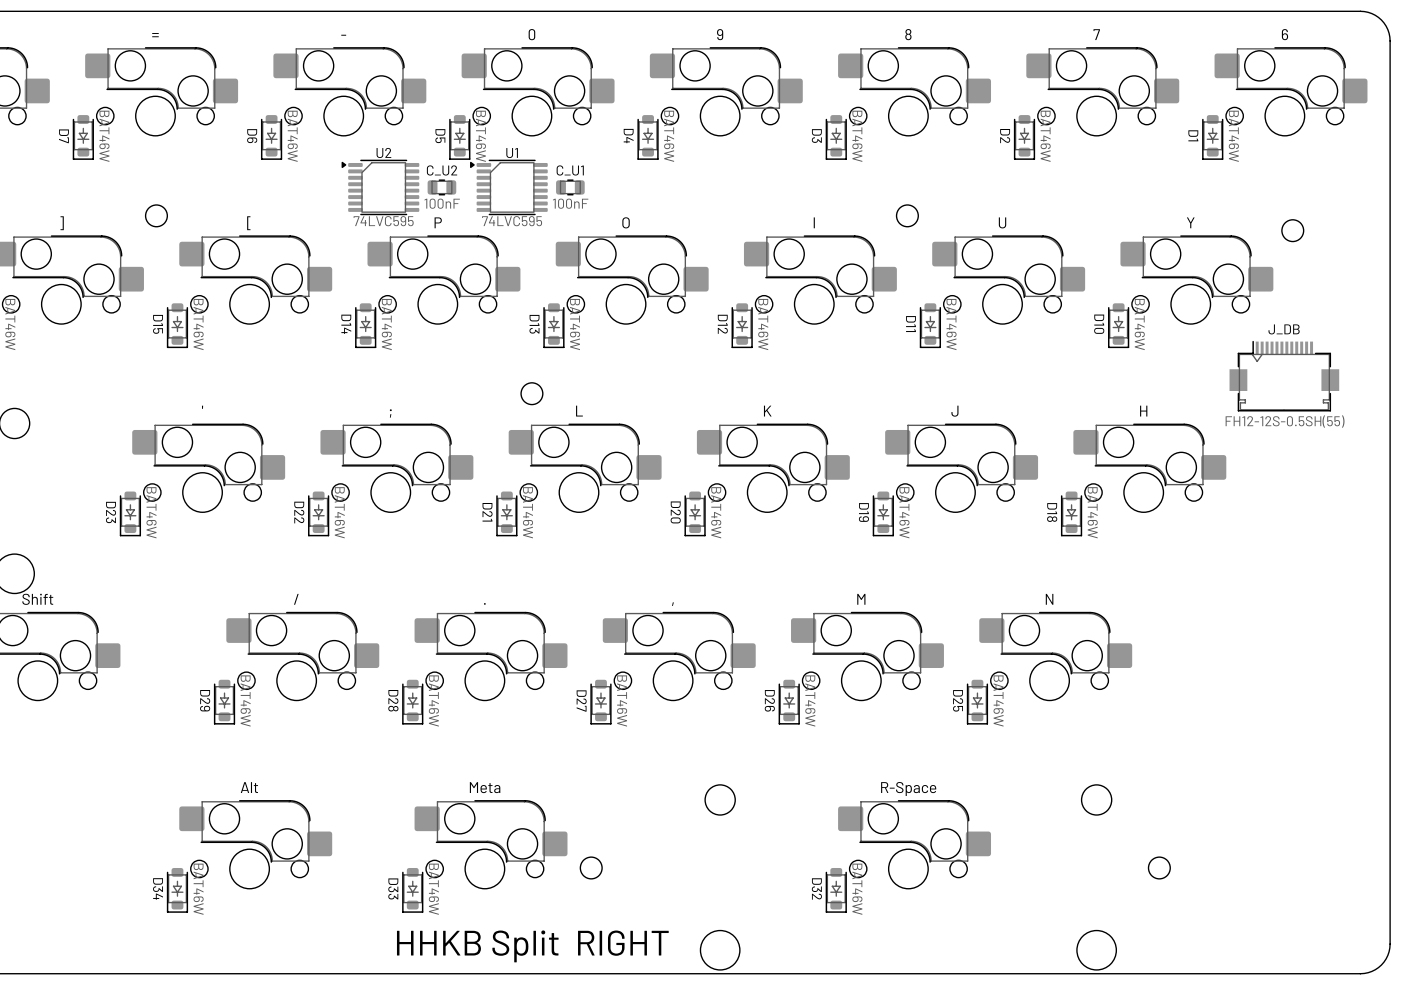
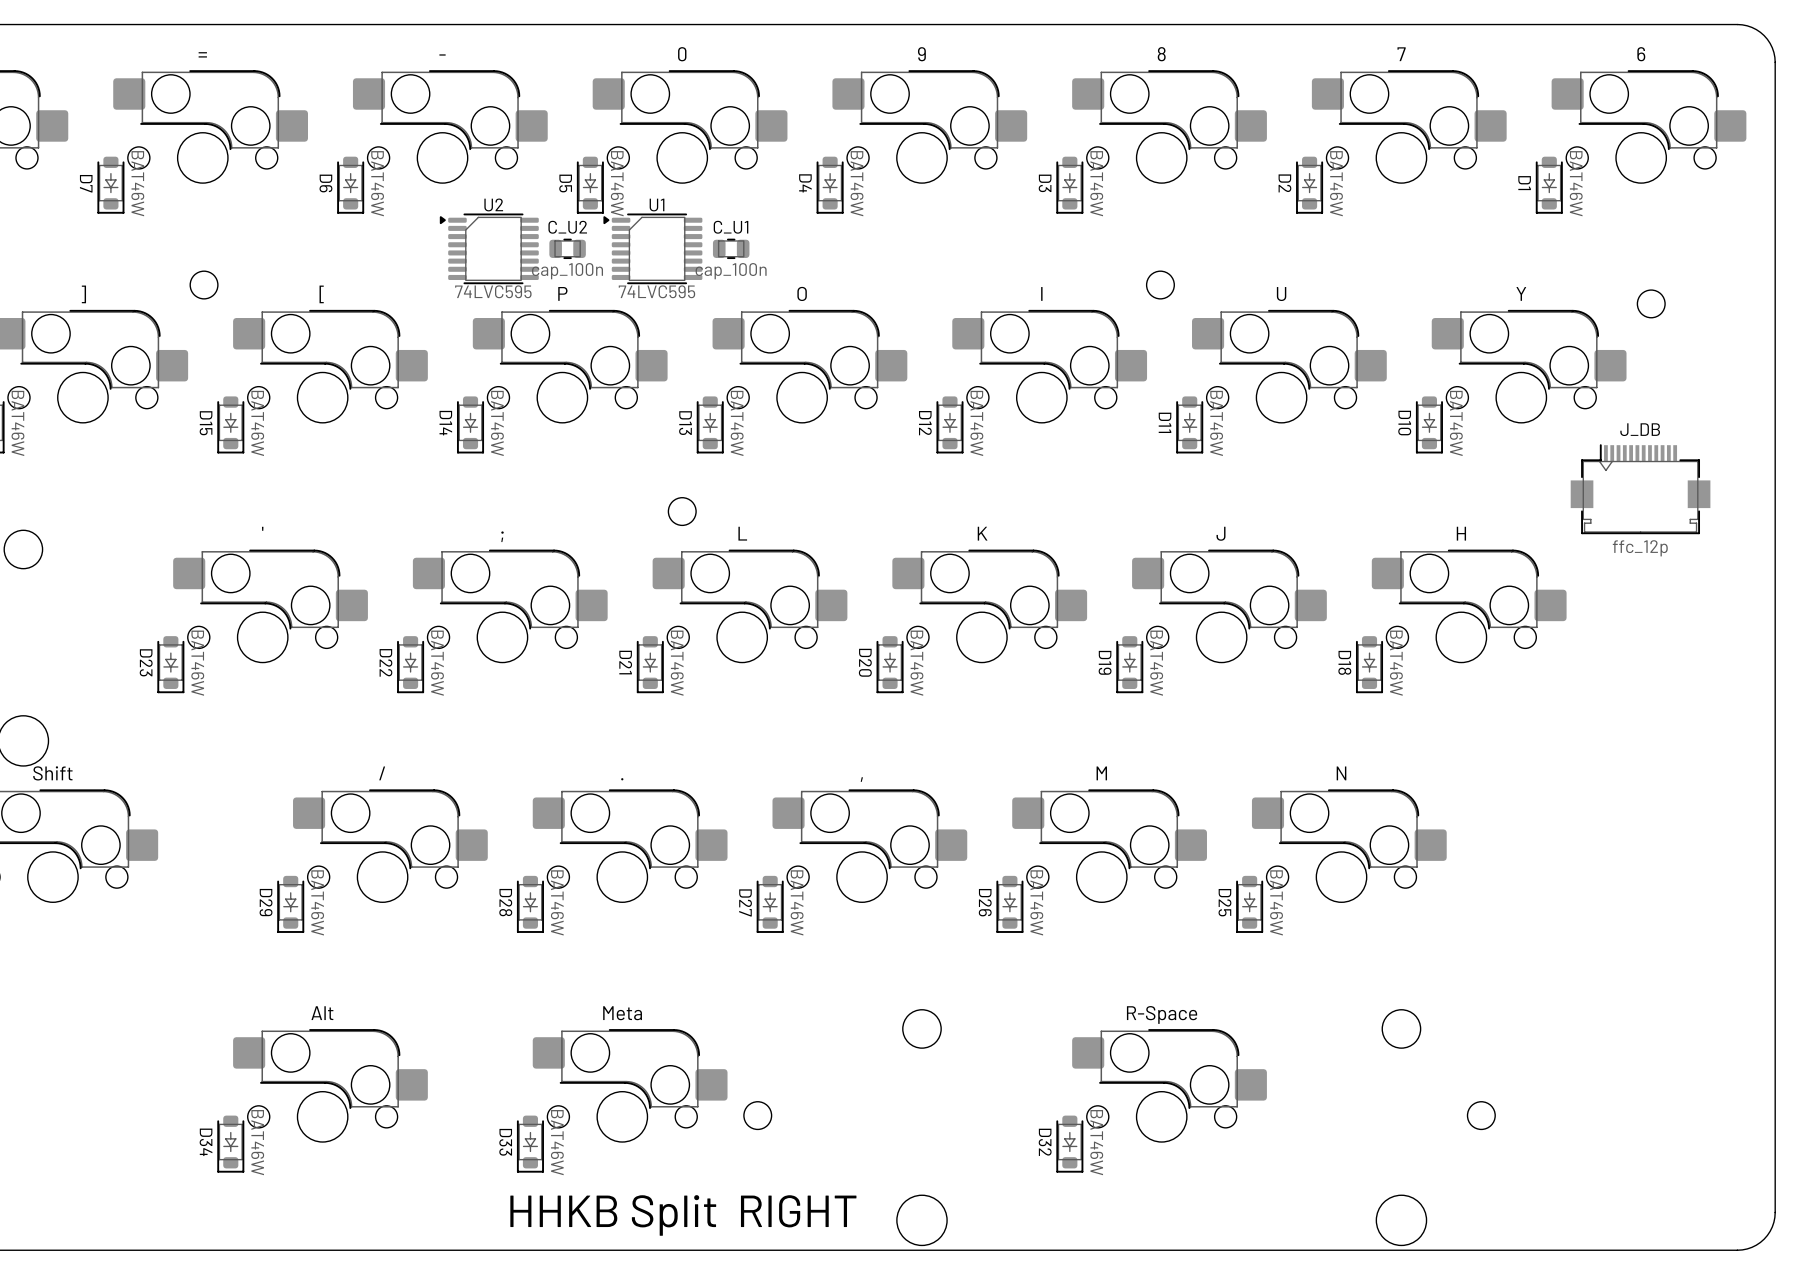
C_U2 value: 100nF (442, 203) -> cap_100n (567, 271)
C_U1 value: 100nF (570, 203) -> cap_100n (731, 271)
J_DB value: FH12-12S-0.5SH(55) (1285, 421) -> ffc_12p (1640, 548)

